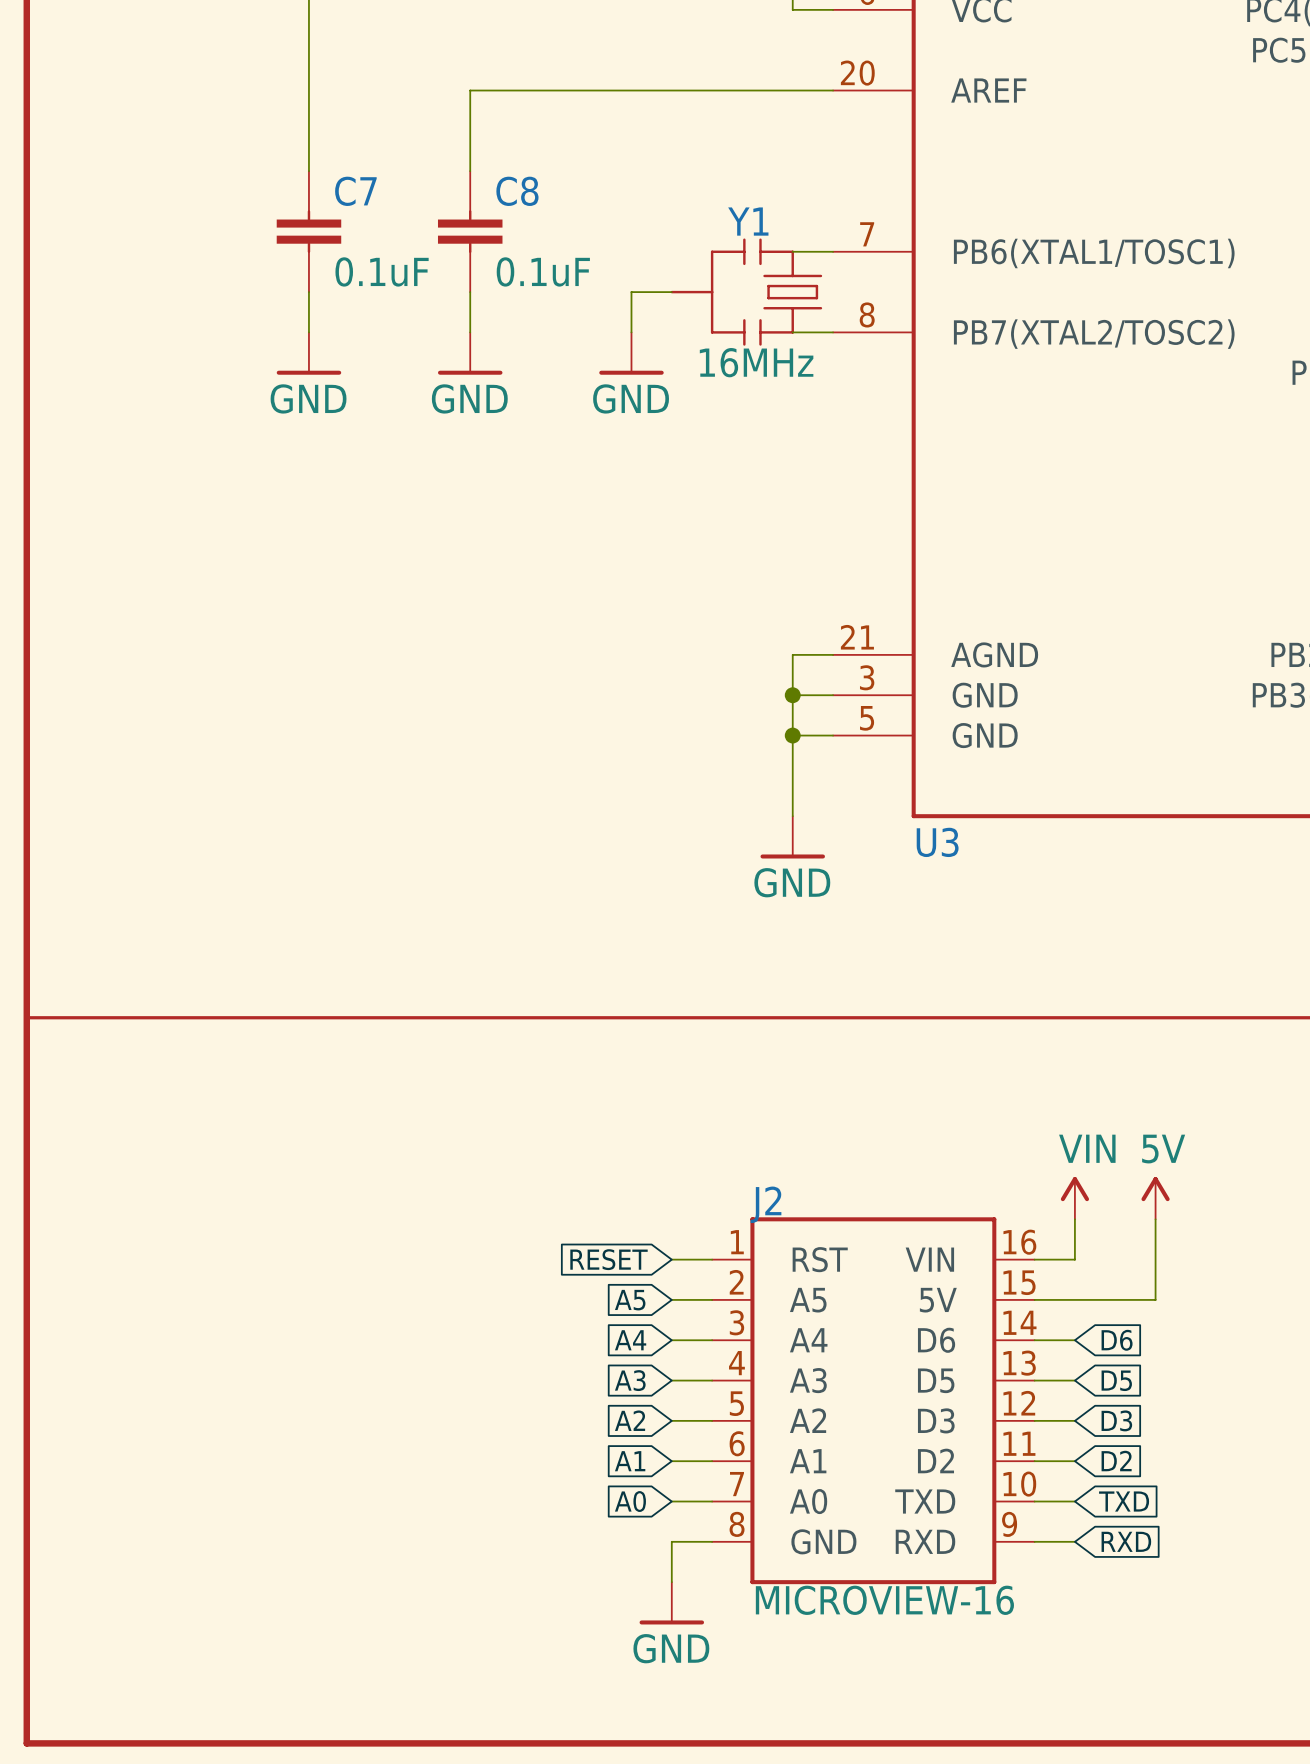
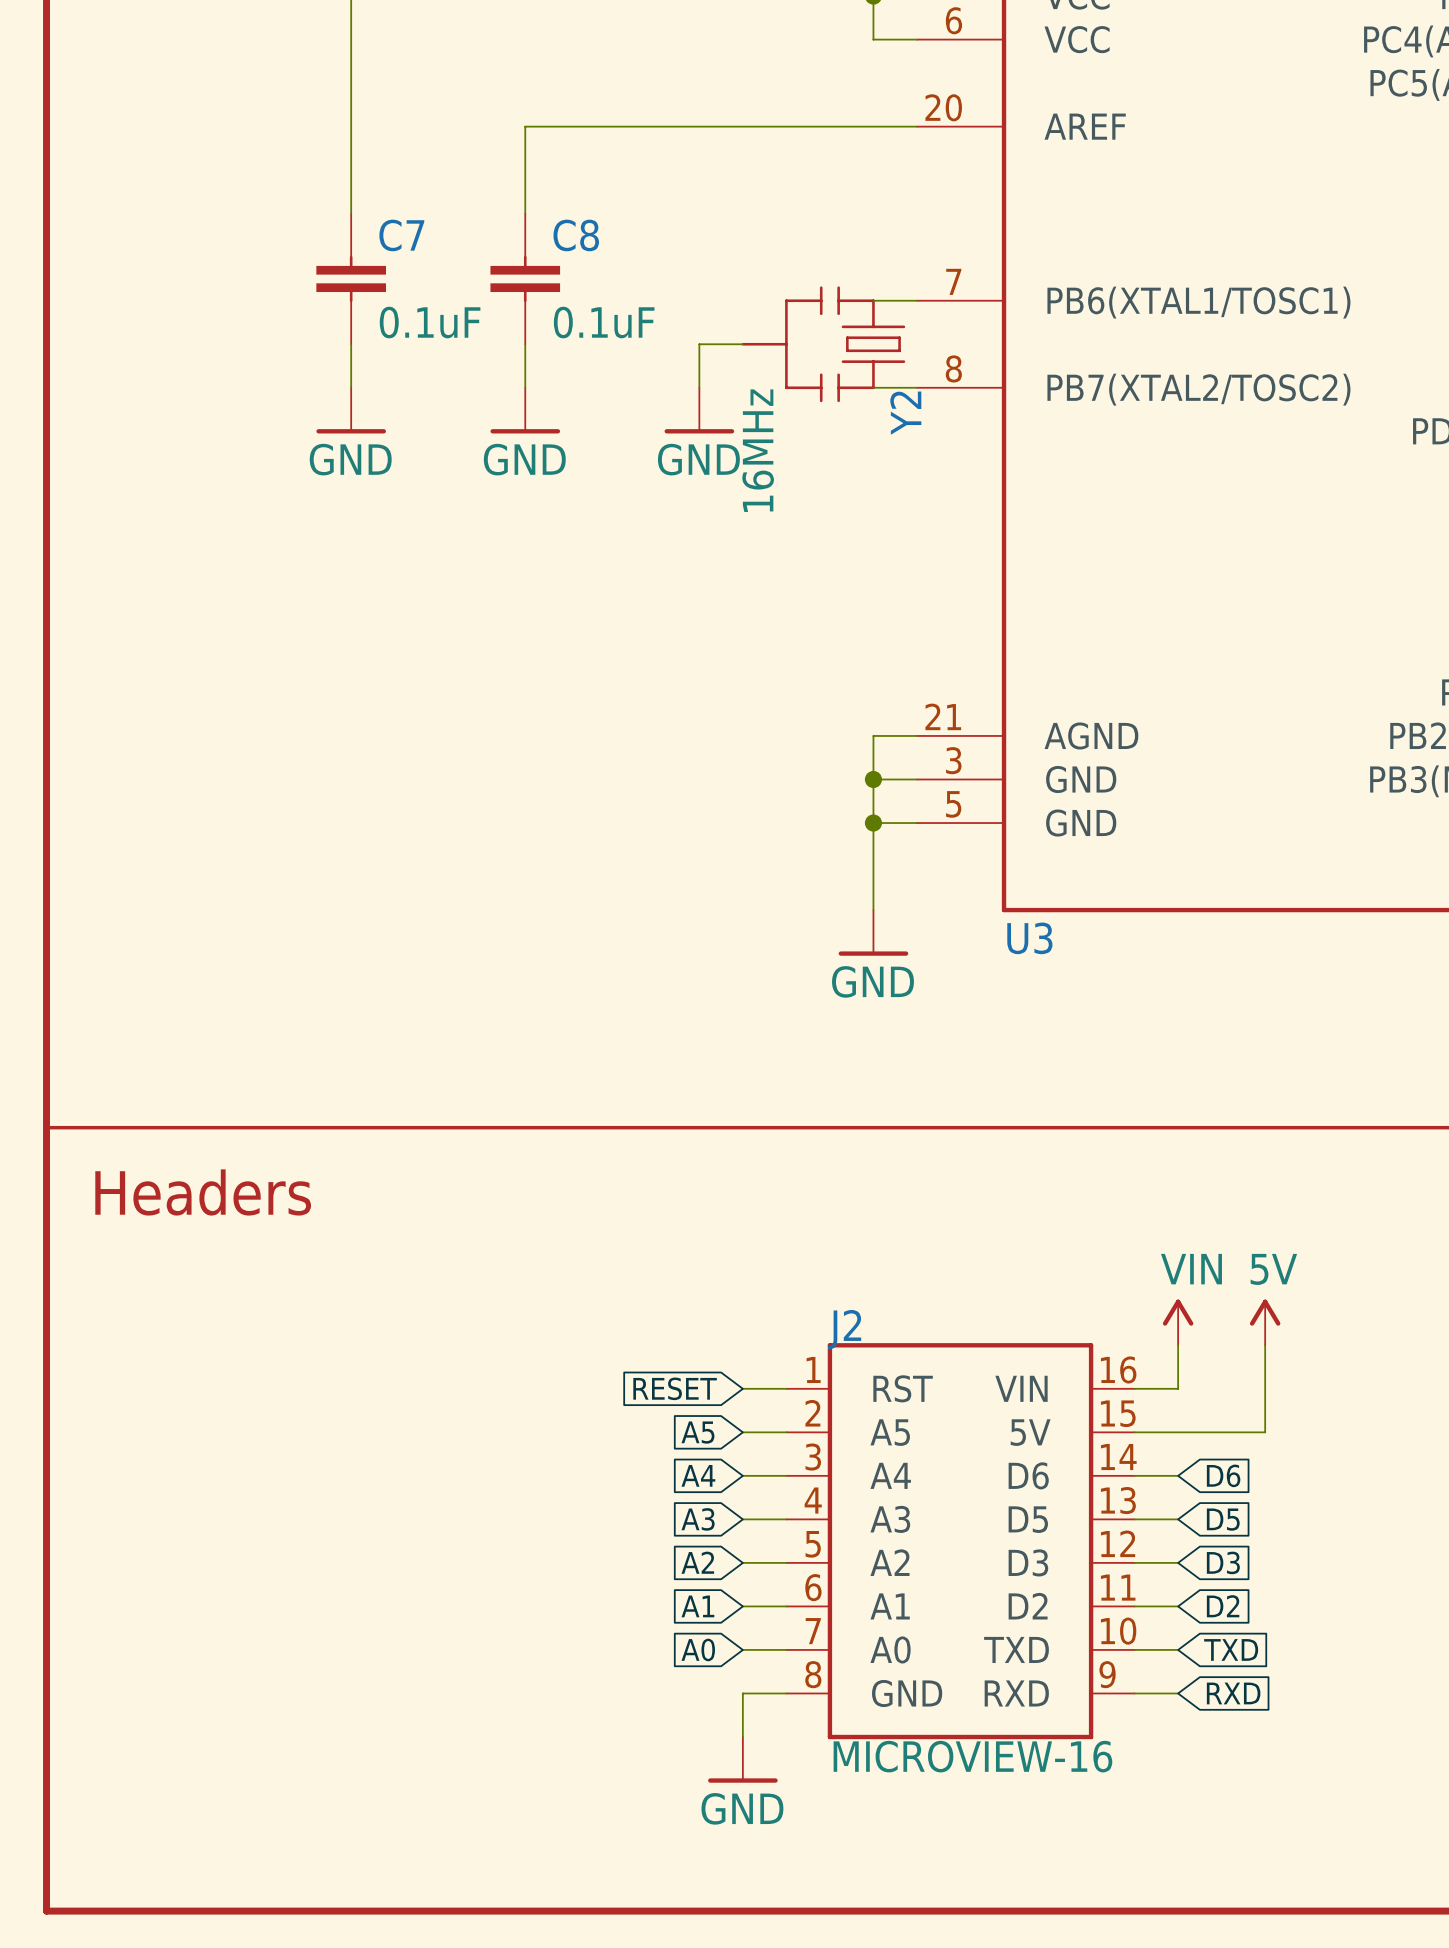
Y1 name: Y1 (748, 221) -> Y2 (905, 413)
Y1 value rotation: 0° (756, 362) -> 90° counterclockwise (758, 450)
text: none -> Headers (203, 1192)

